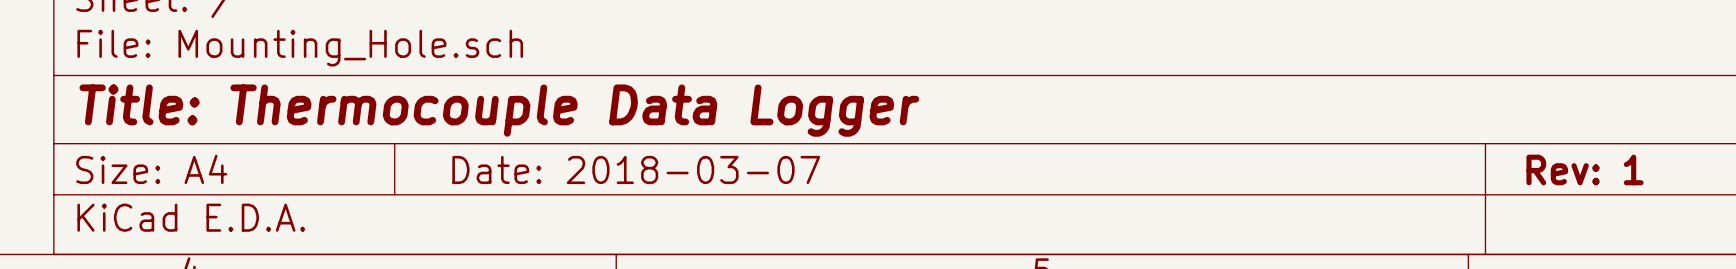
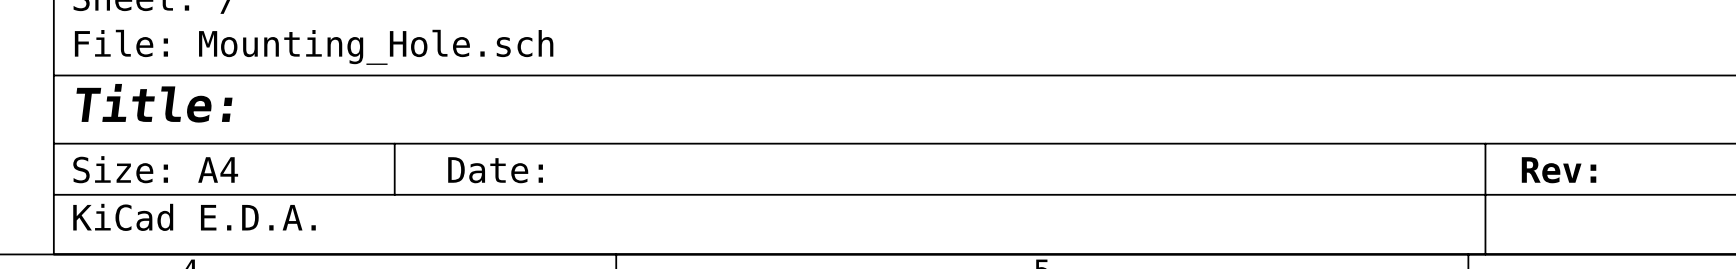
title block: Title: Thermocouple Data Logger (499, 110) -> Title: (154, 103)
title block: Date: 2018-03-07 (636, 169) -> Date: (495, 170)
title block: Rev: 1 (1584, 169) -> Rev: (1559, 170)

